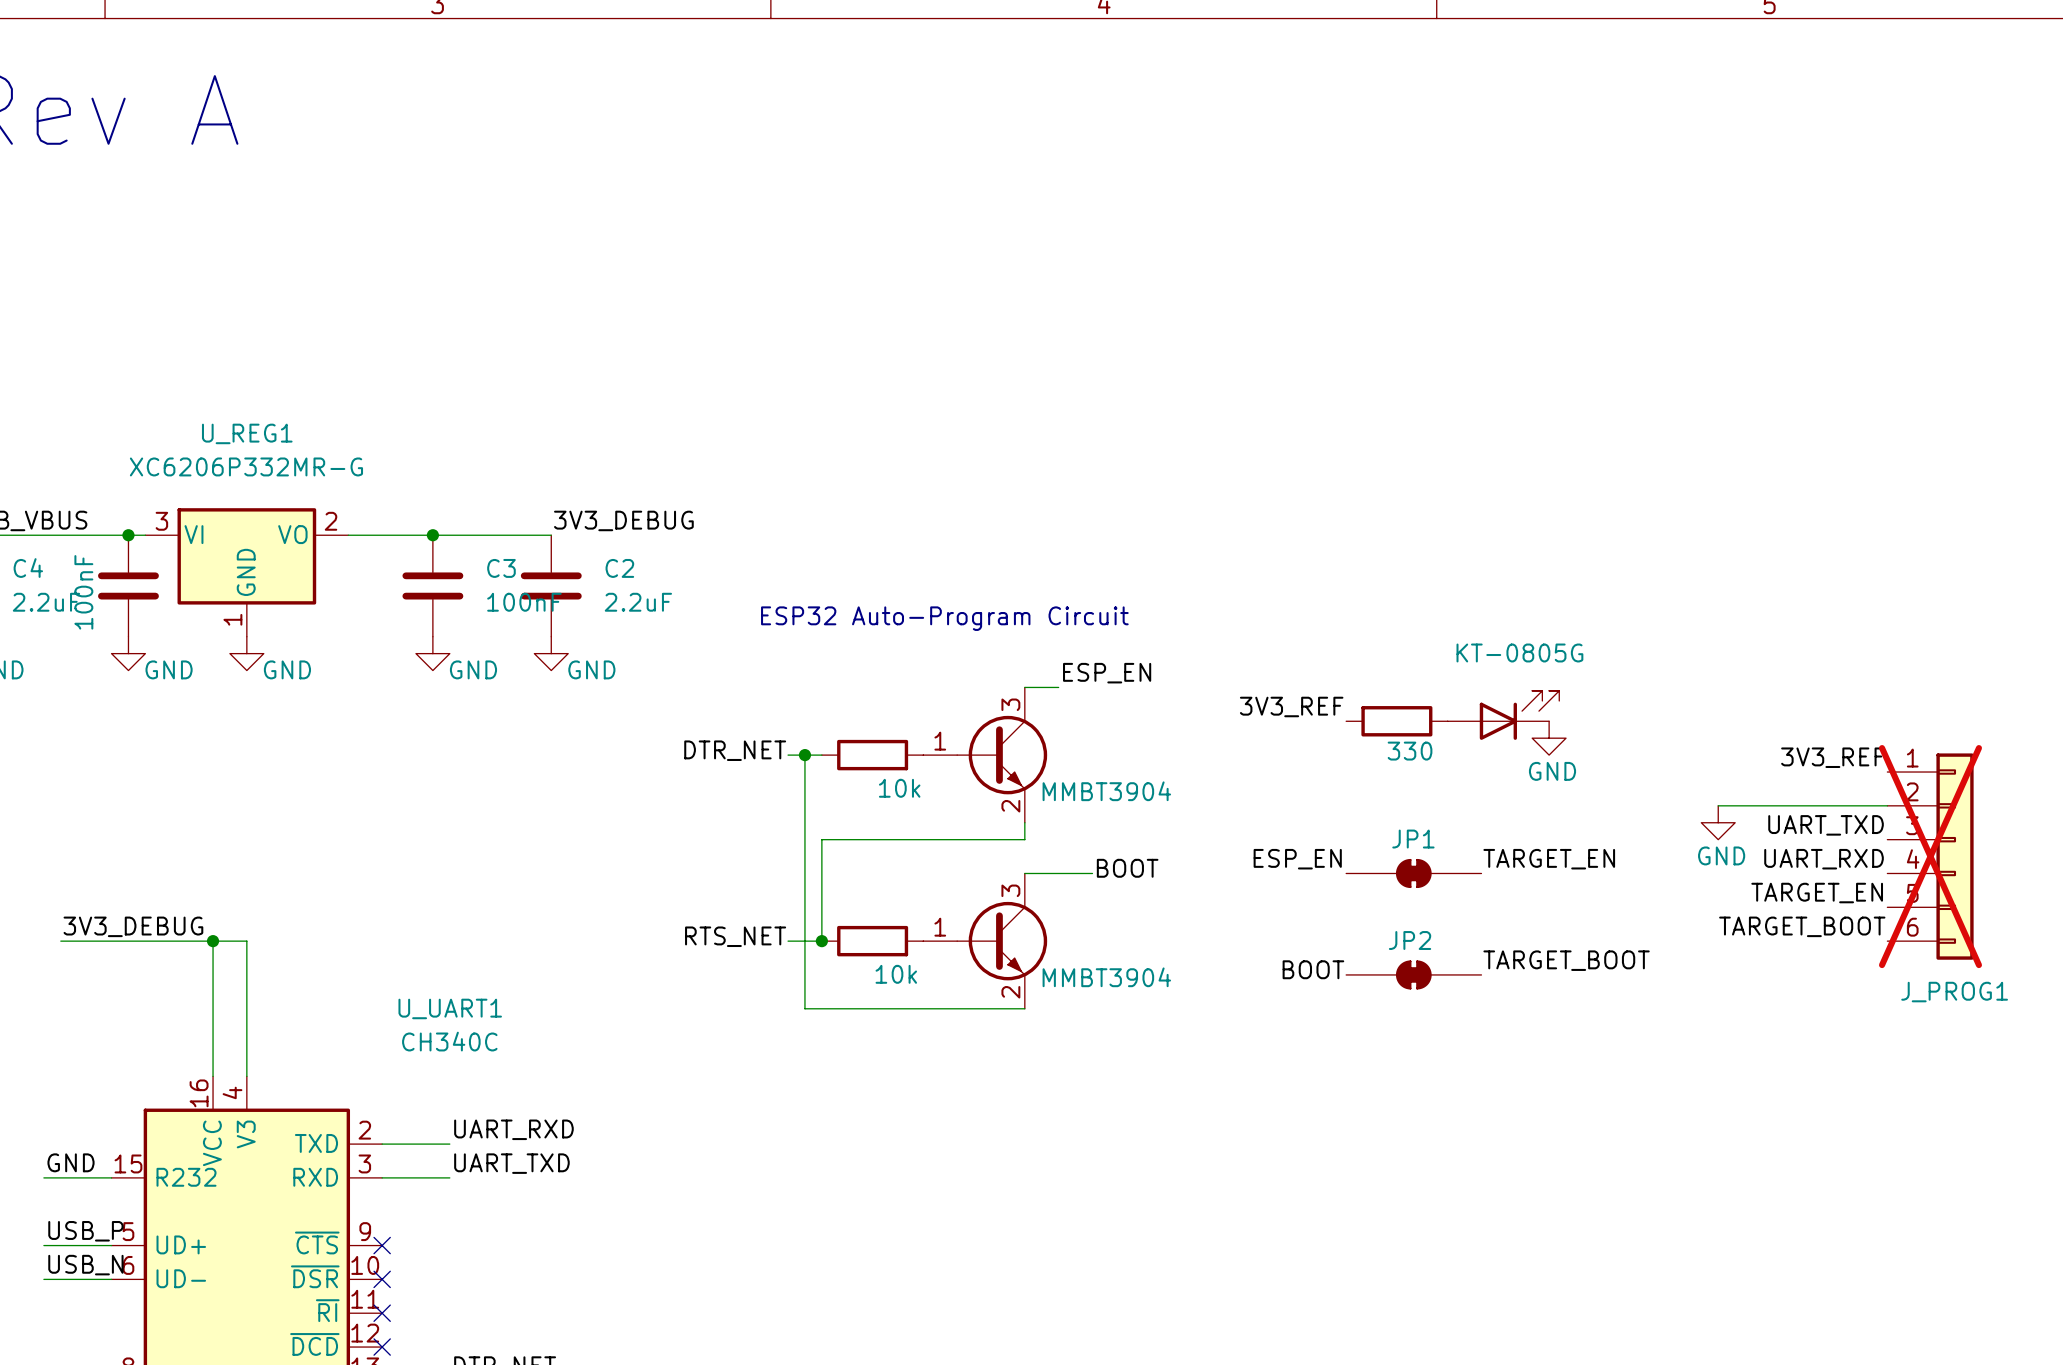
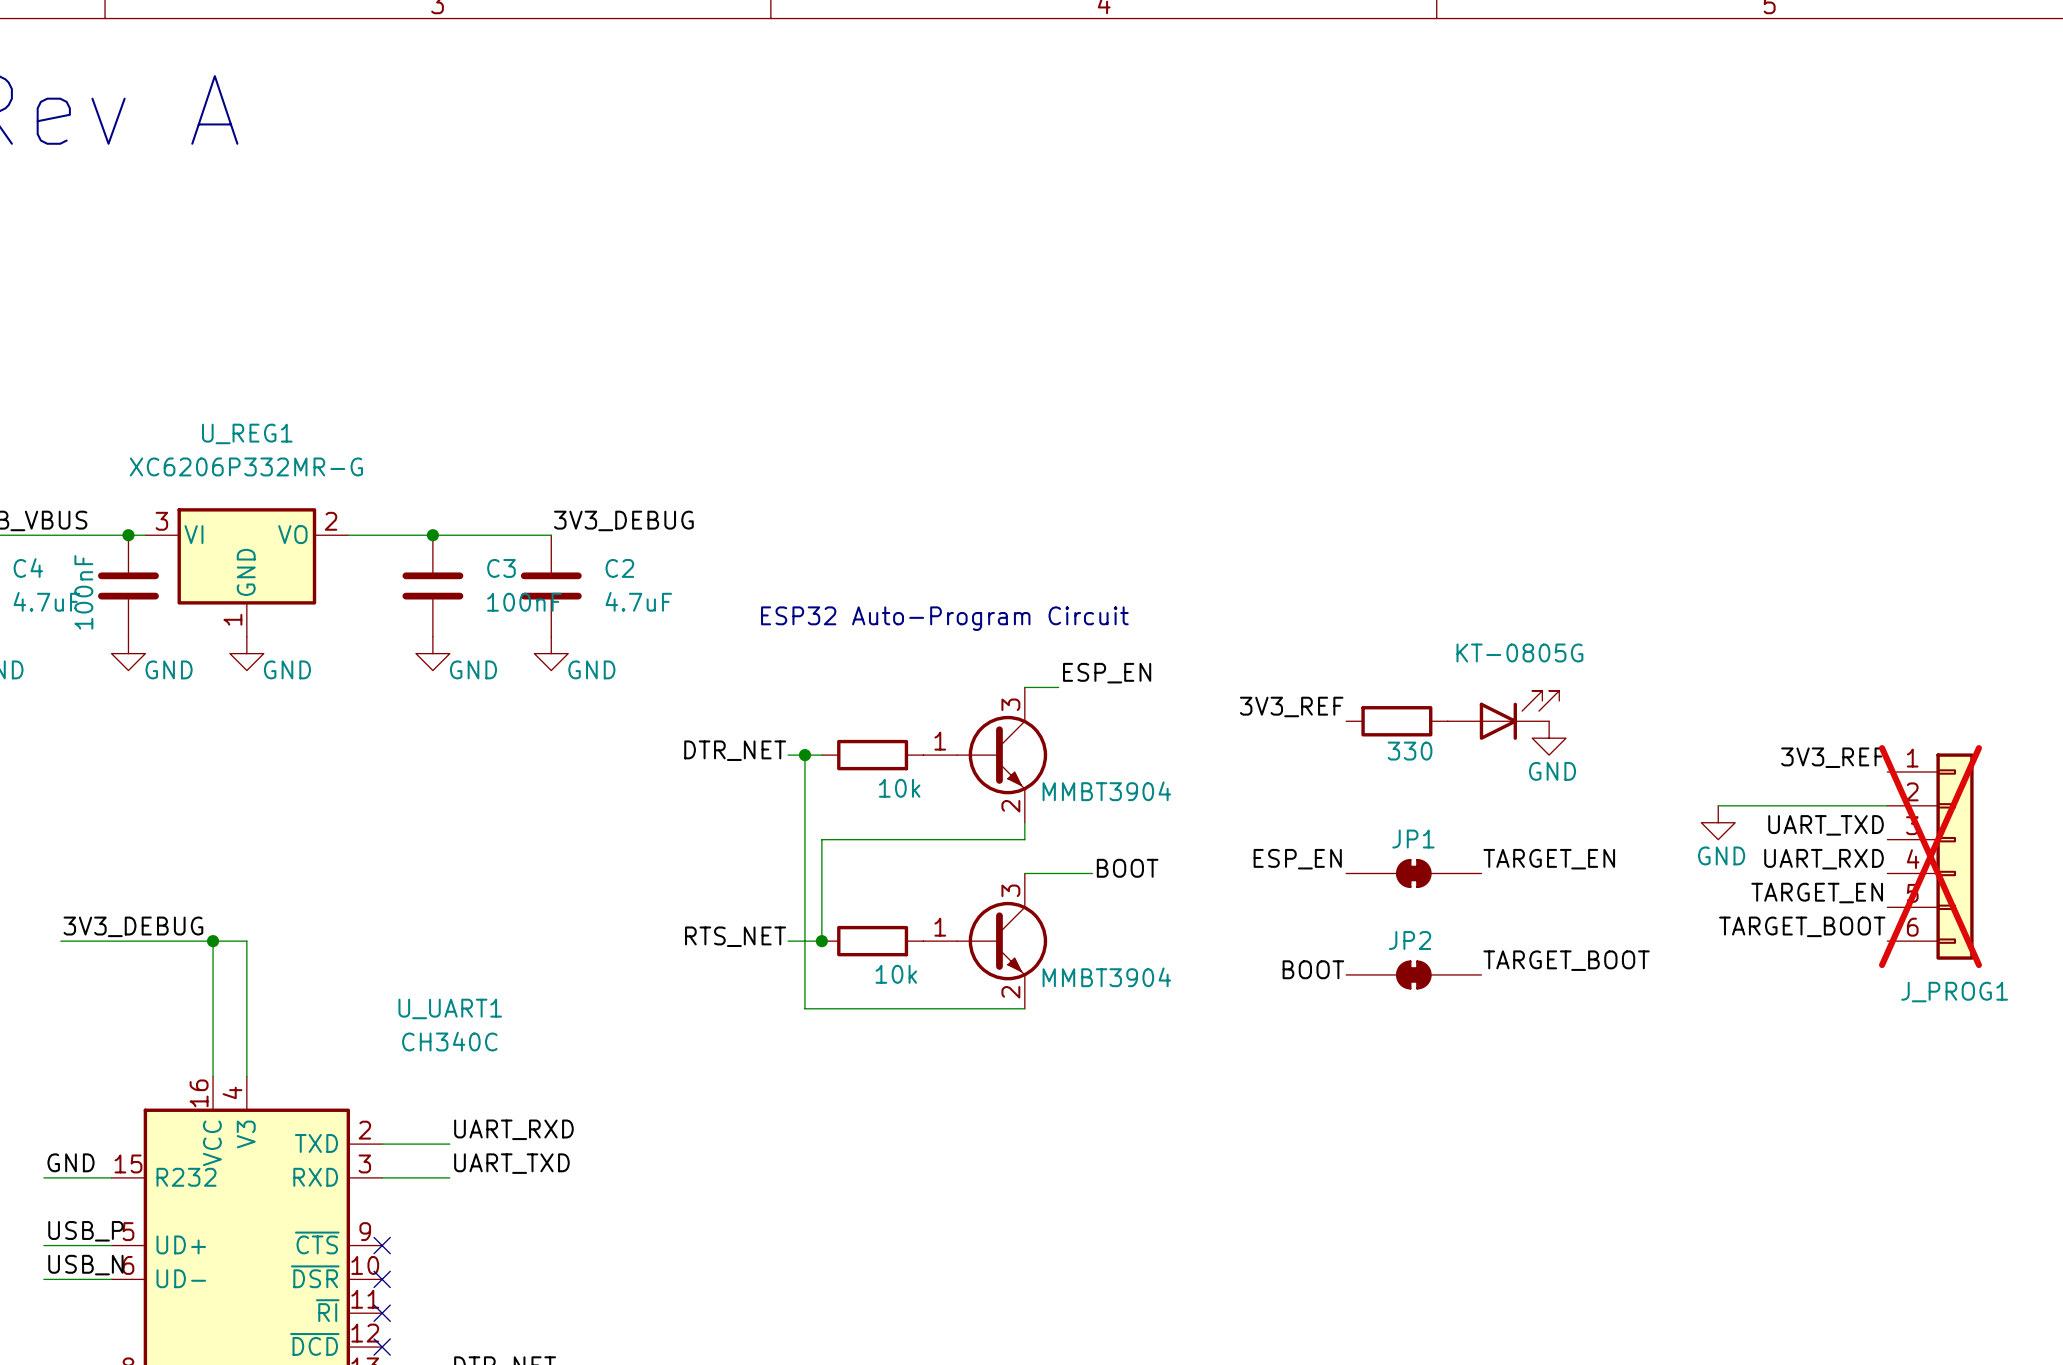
C4 value: 2.2uF (46, 602) -> 4.7uF (46, 601)
C2 value: 2.2uF (638, 602) -> 4.7uF (638, 601)

